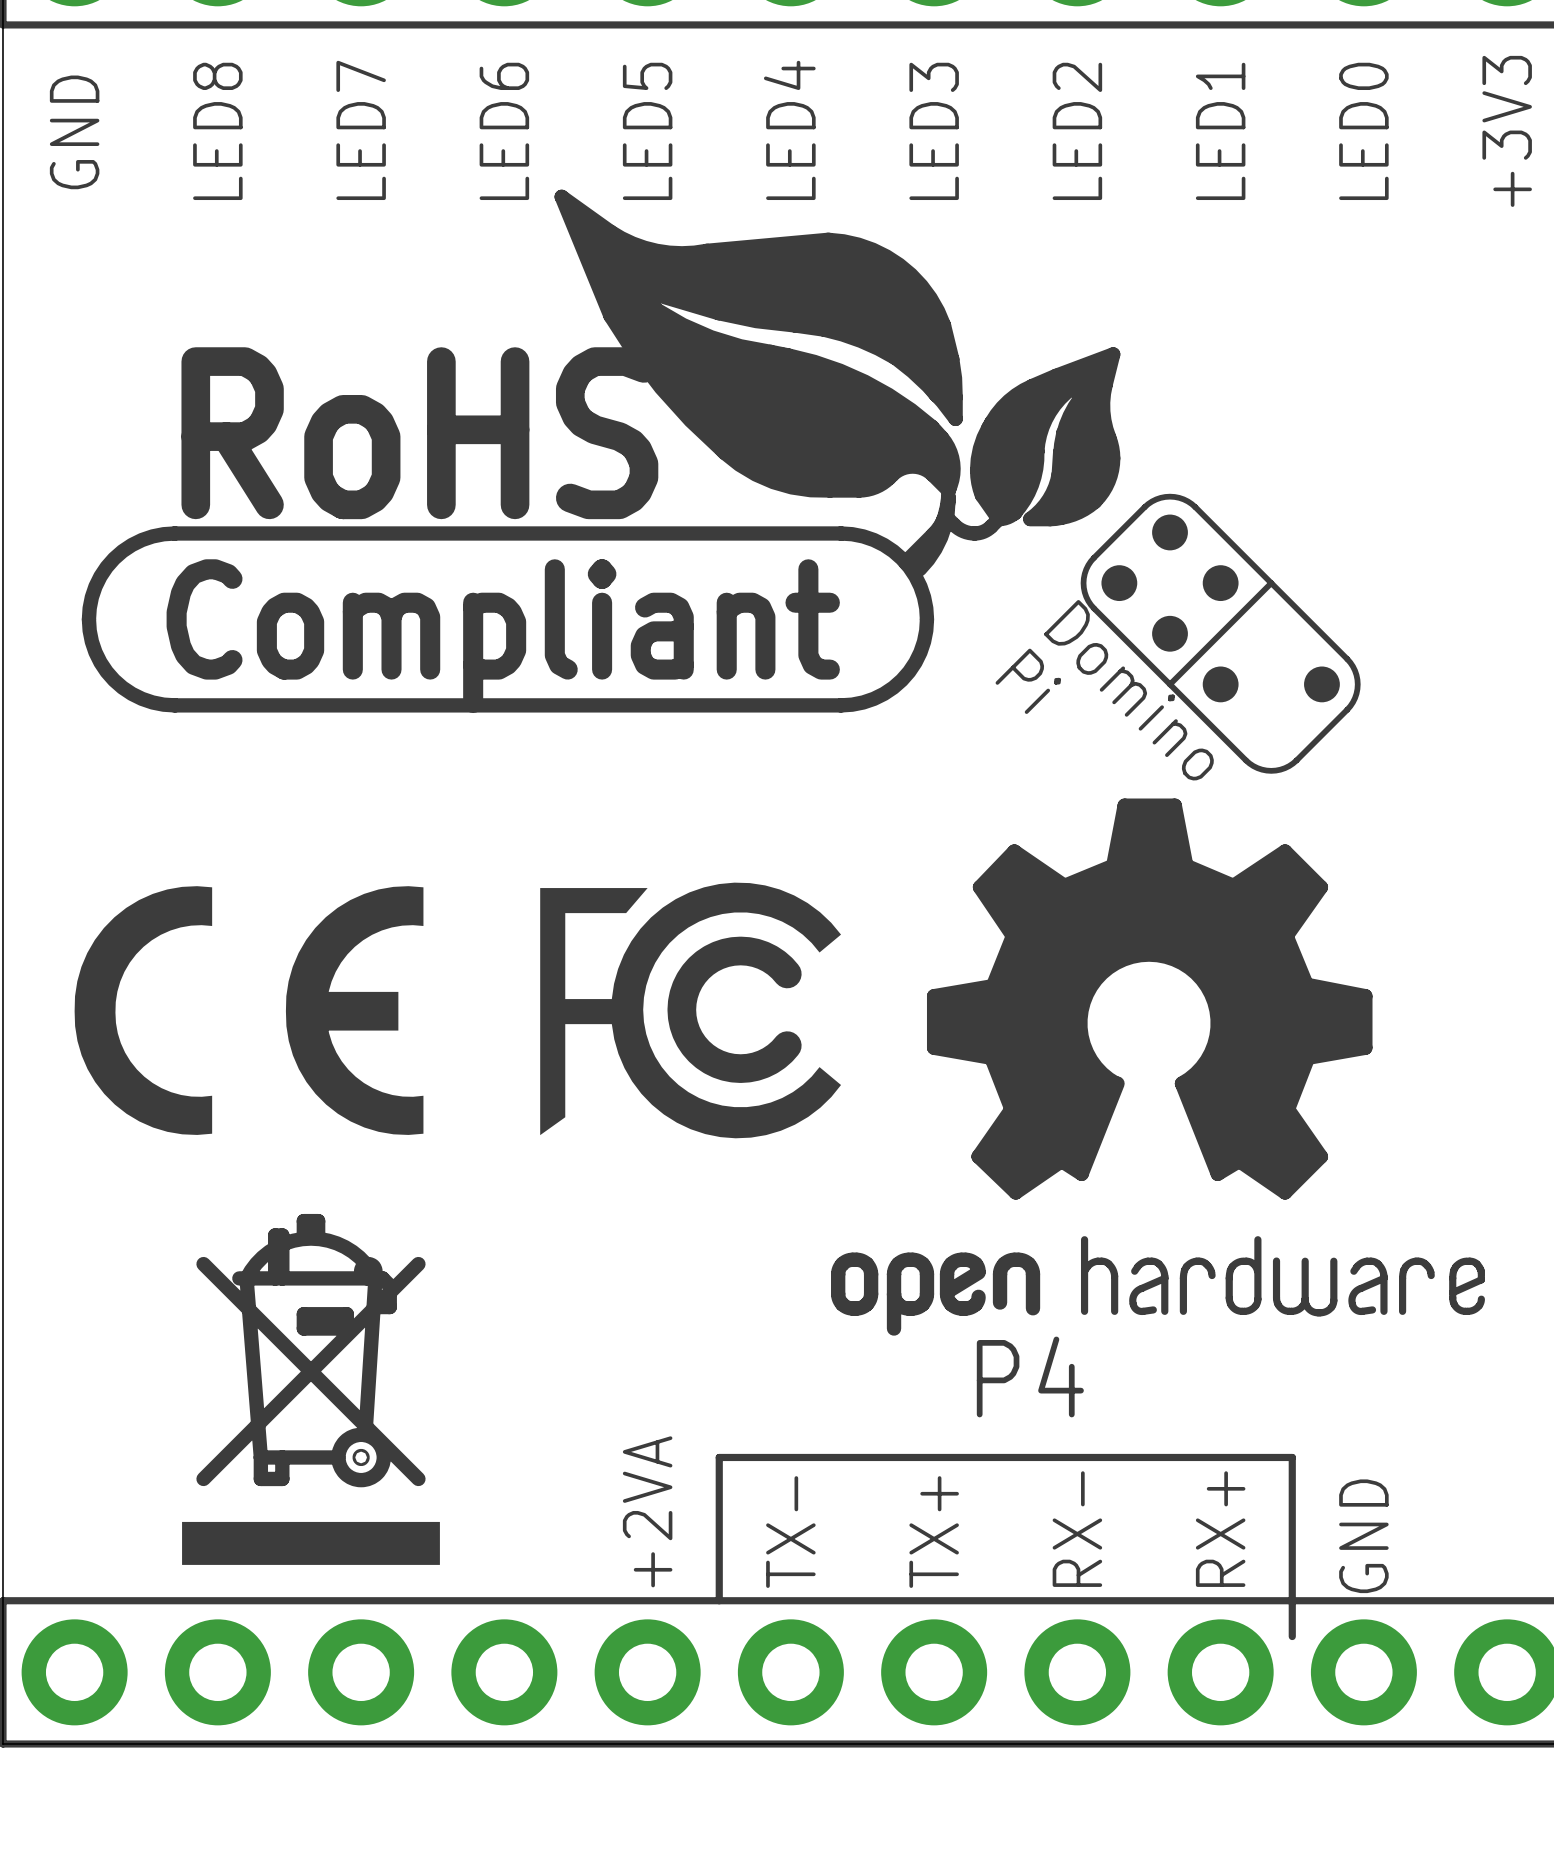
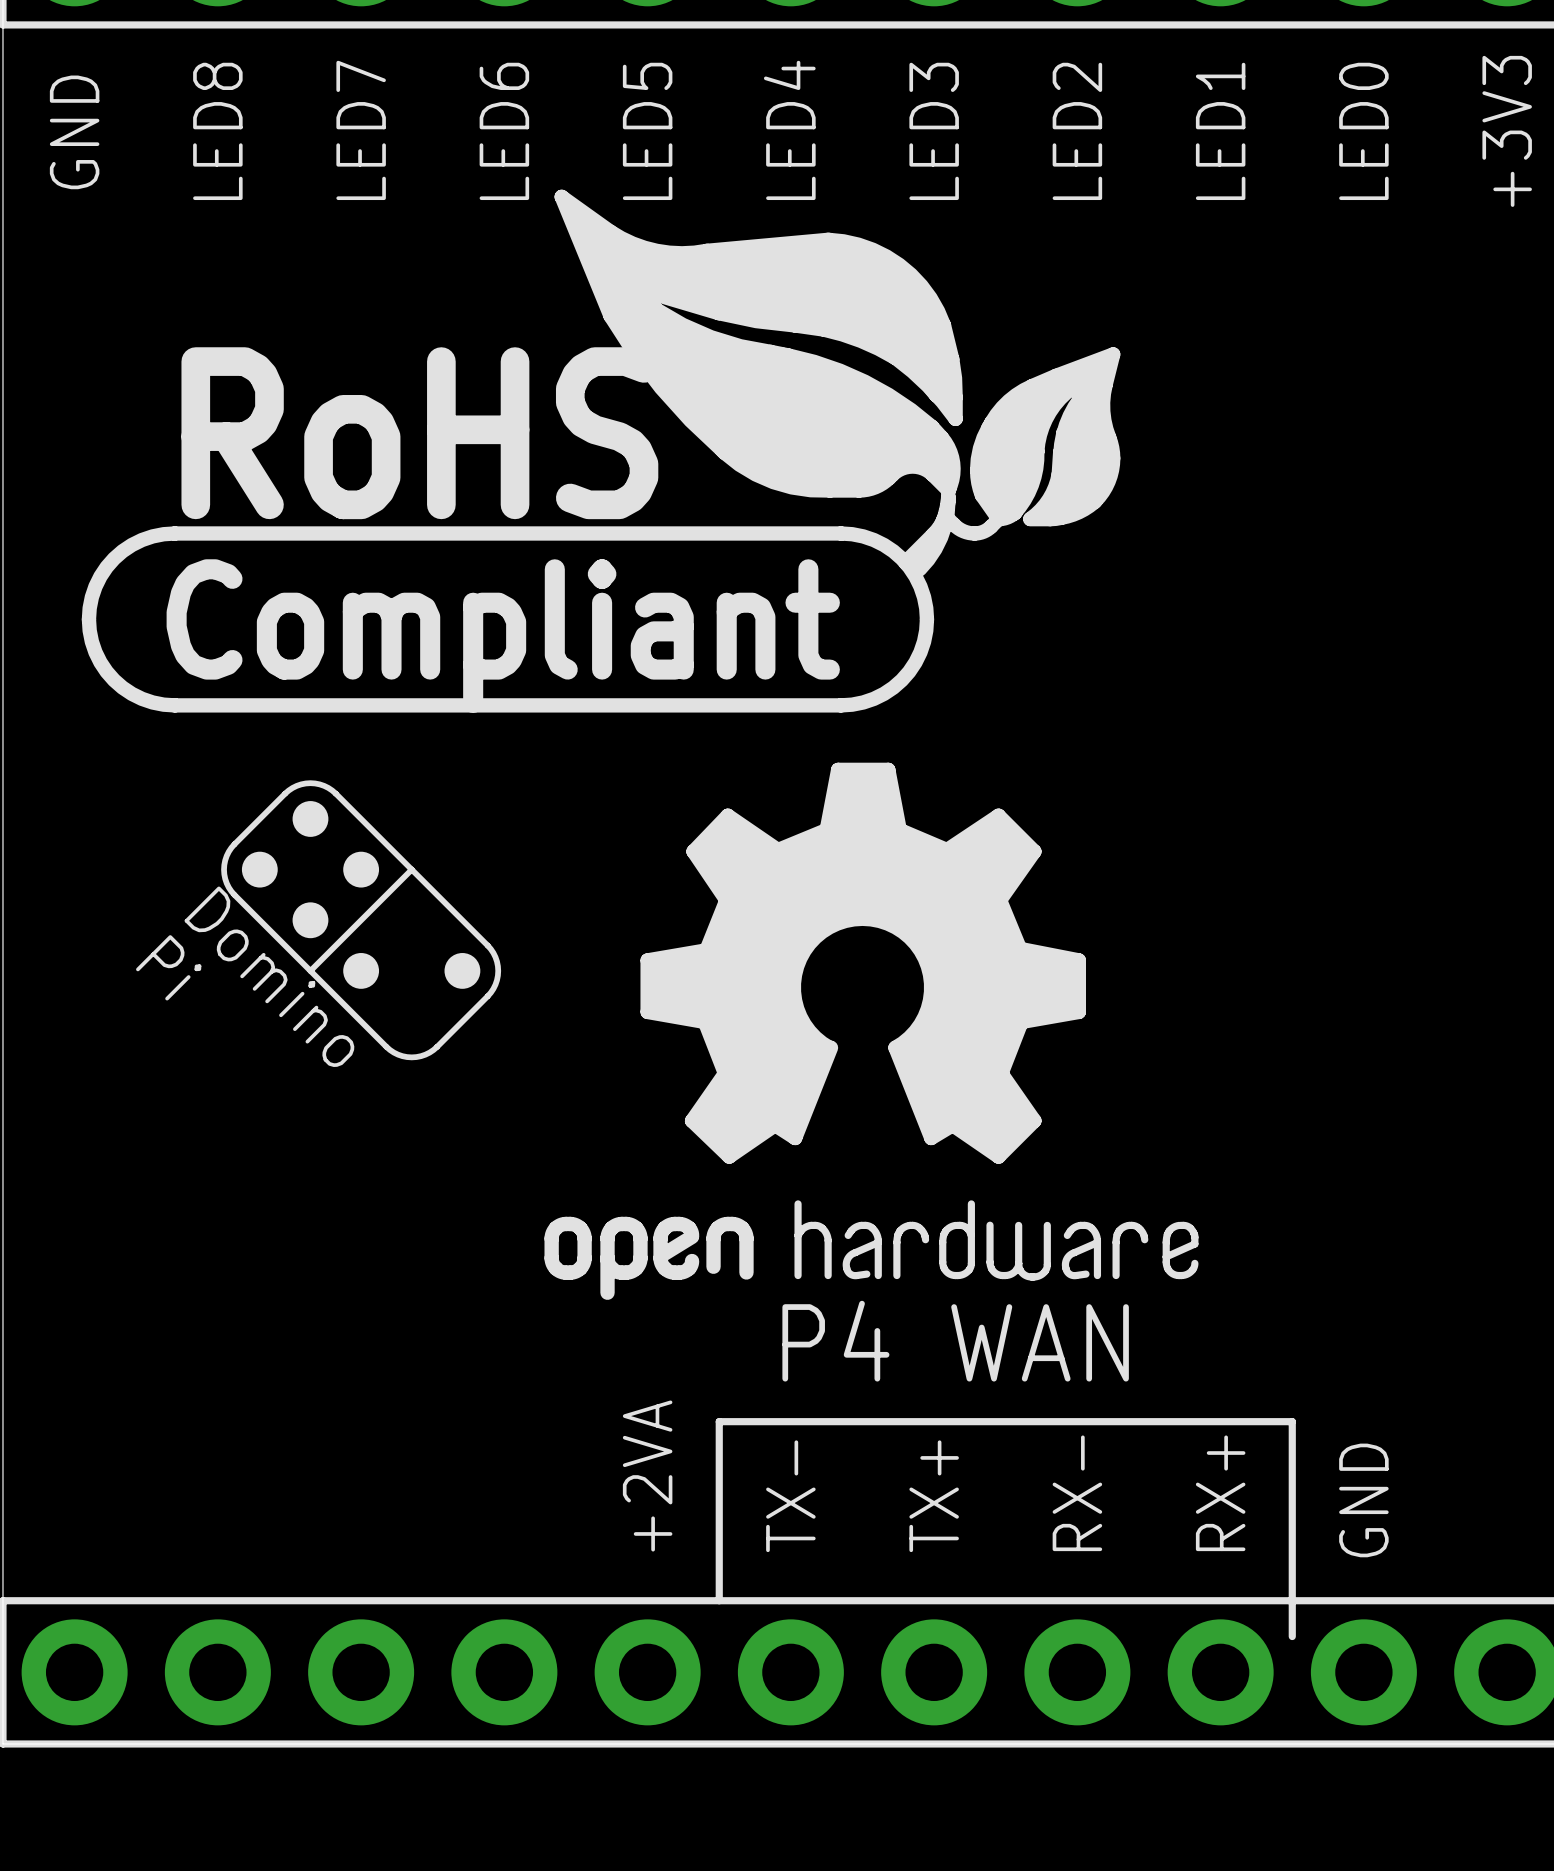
drawing position: (1220, 633) -> (361, 920)
drawing: [540, 882, 842, 1139] -> none
drawing: [74, 886, 424, 1135] -> none
drawing position: (1157, 1067) -> (871, 1031)
drawing: [182, 1213, 440, 1565] -> none
text: none -> P4 WAN (955, 1341)
text: P4 (1030, 1376) -> none
line: (1292, 1457) (719, 1457) -> (1292, 1457) (1292, 1421) (719, 1421) (719, 1457)
text position: +2VA (647, 1511) -> +2VA (647, 1476)
text position: RX- (1077, 1529) -> RX- (1077, 1493)
text position: RX+ (1220, 1529) -> RX+ (1220, 1493)
text position: TX- (790, 1532) -> TX- (790, 1496)
text position: TX+ (934, 1532) -> TX+ (934, 1496)
text position: GND (1363, 1536) -> GND (1363, 1500)

